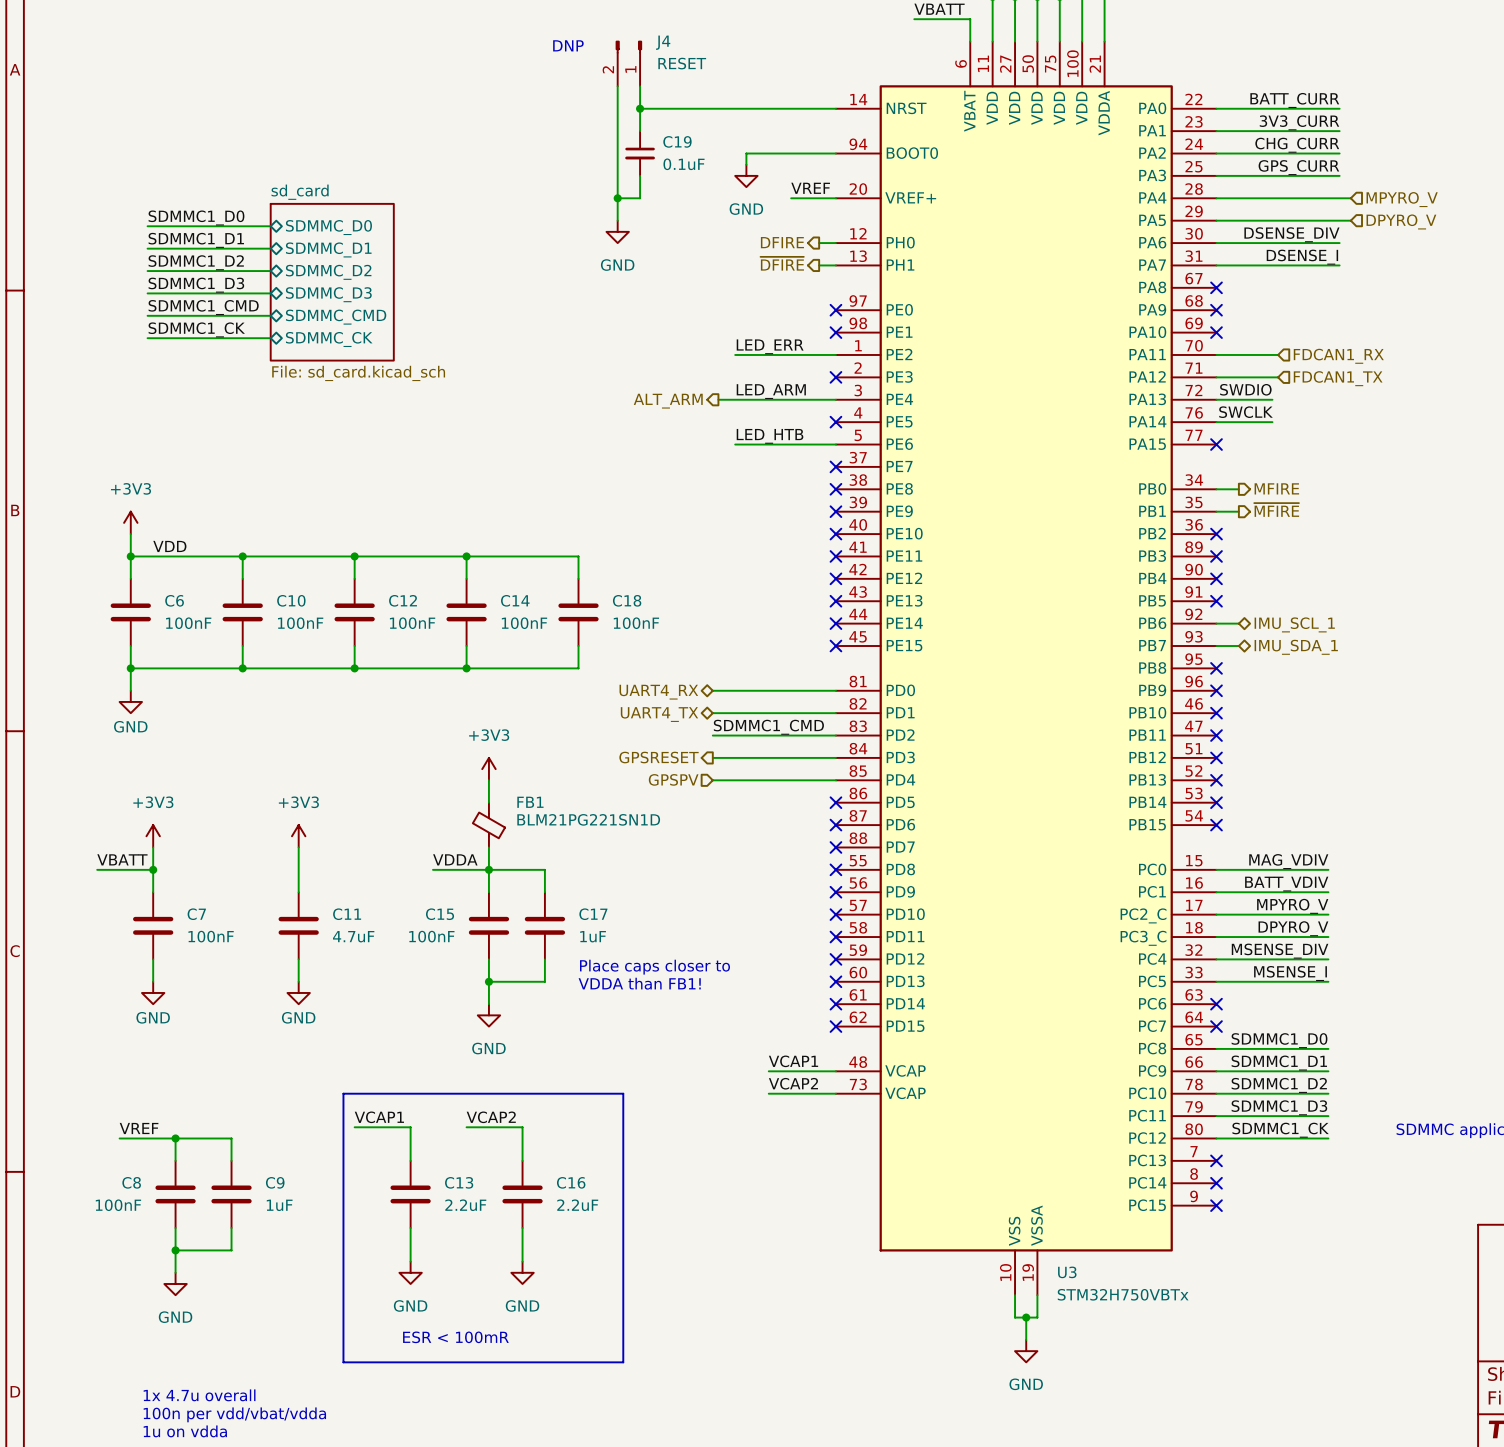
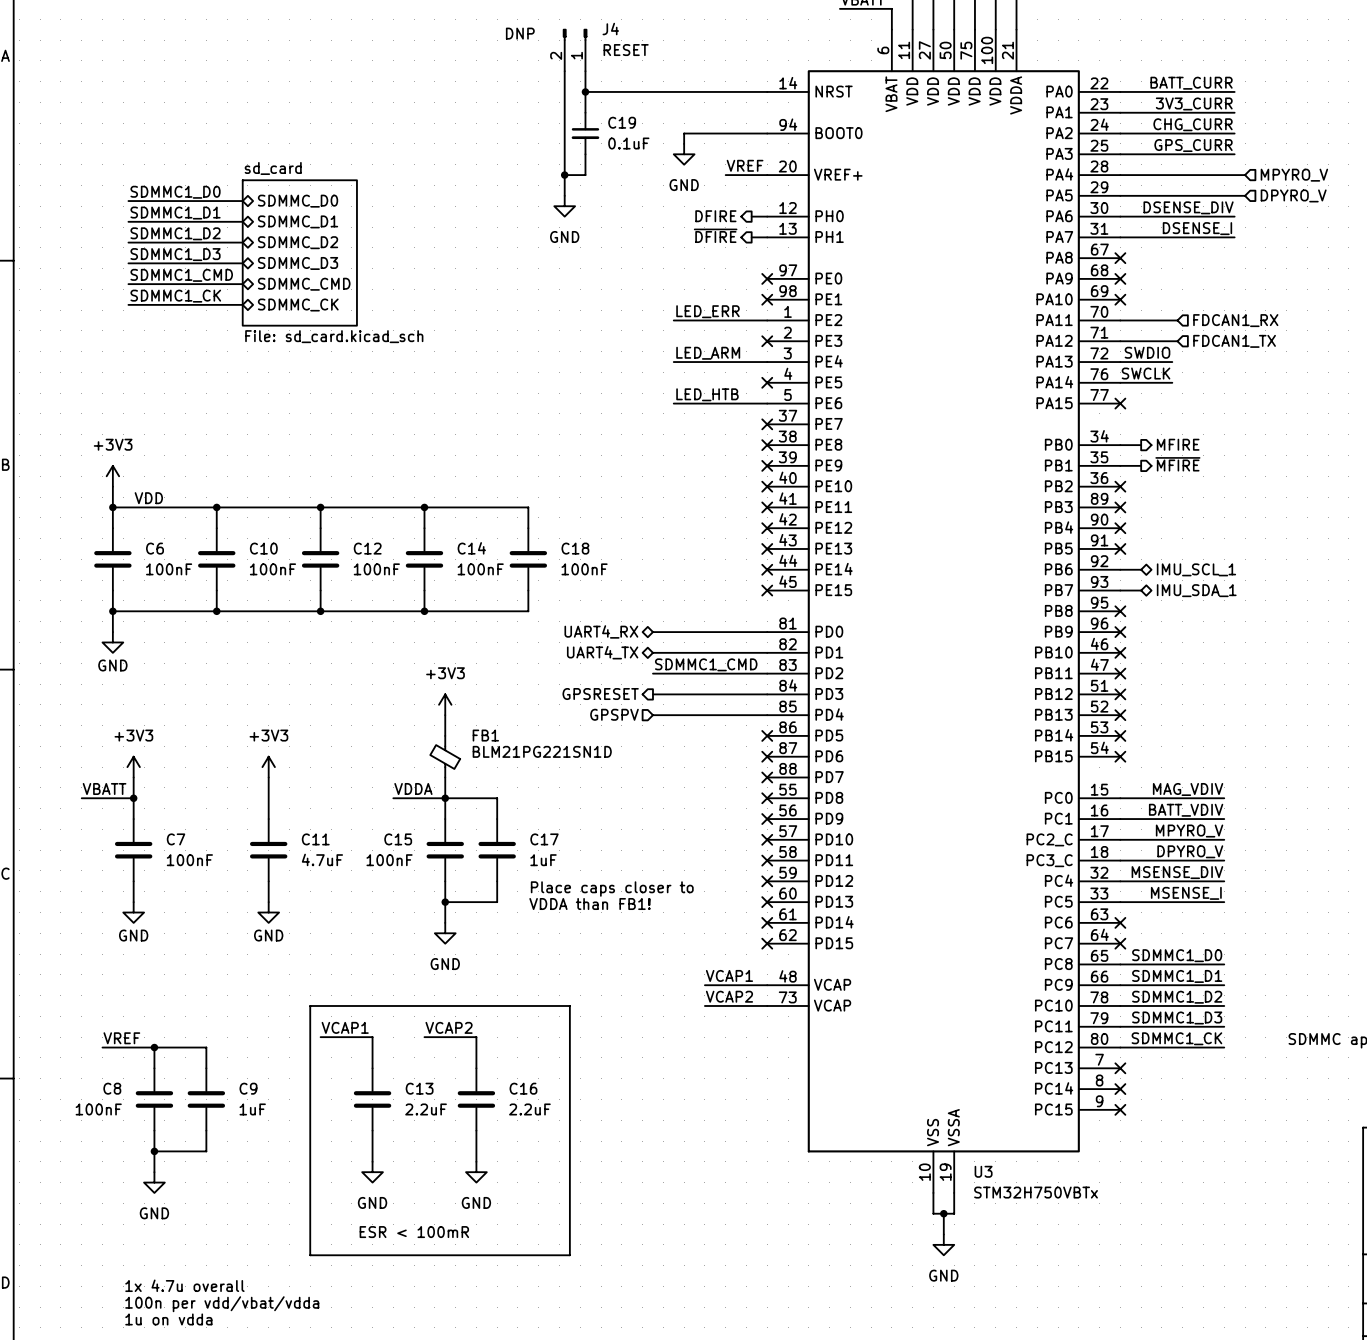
wire: (718, 399) (735, 399) -> none
hierarchical label: ALT_ARM (668, 401) -> none

